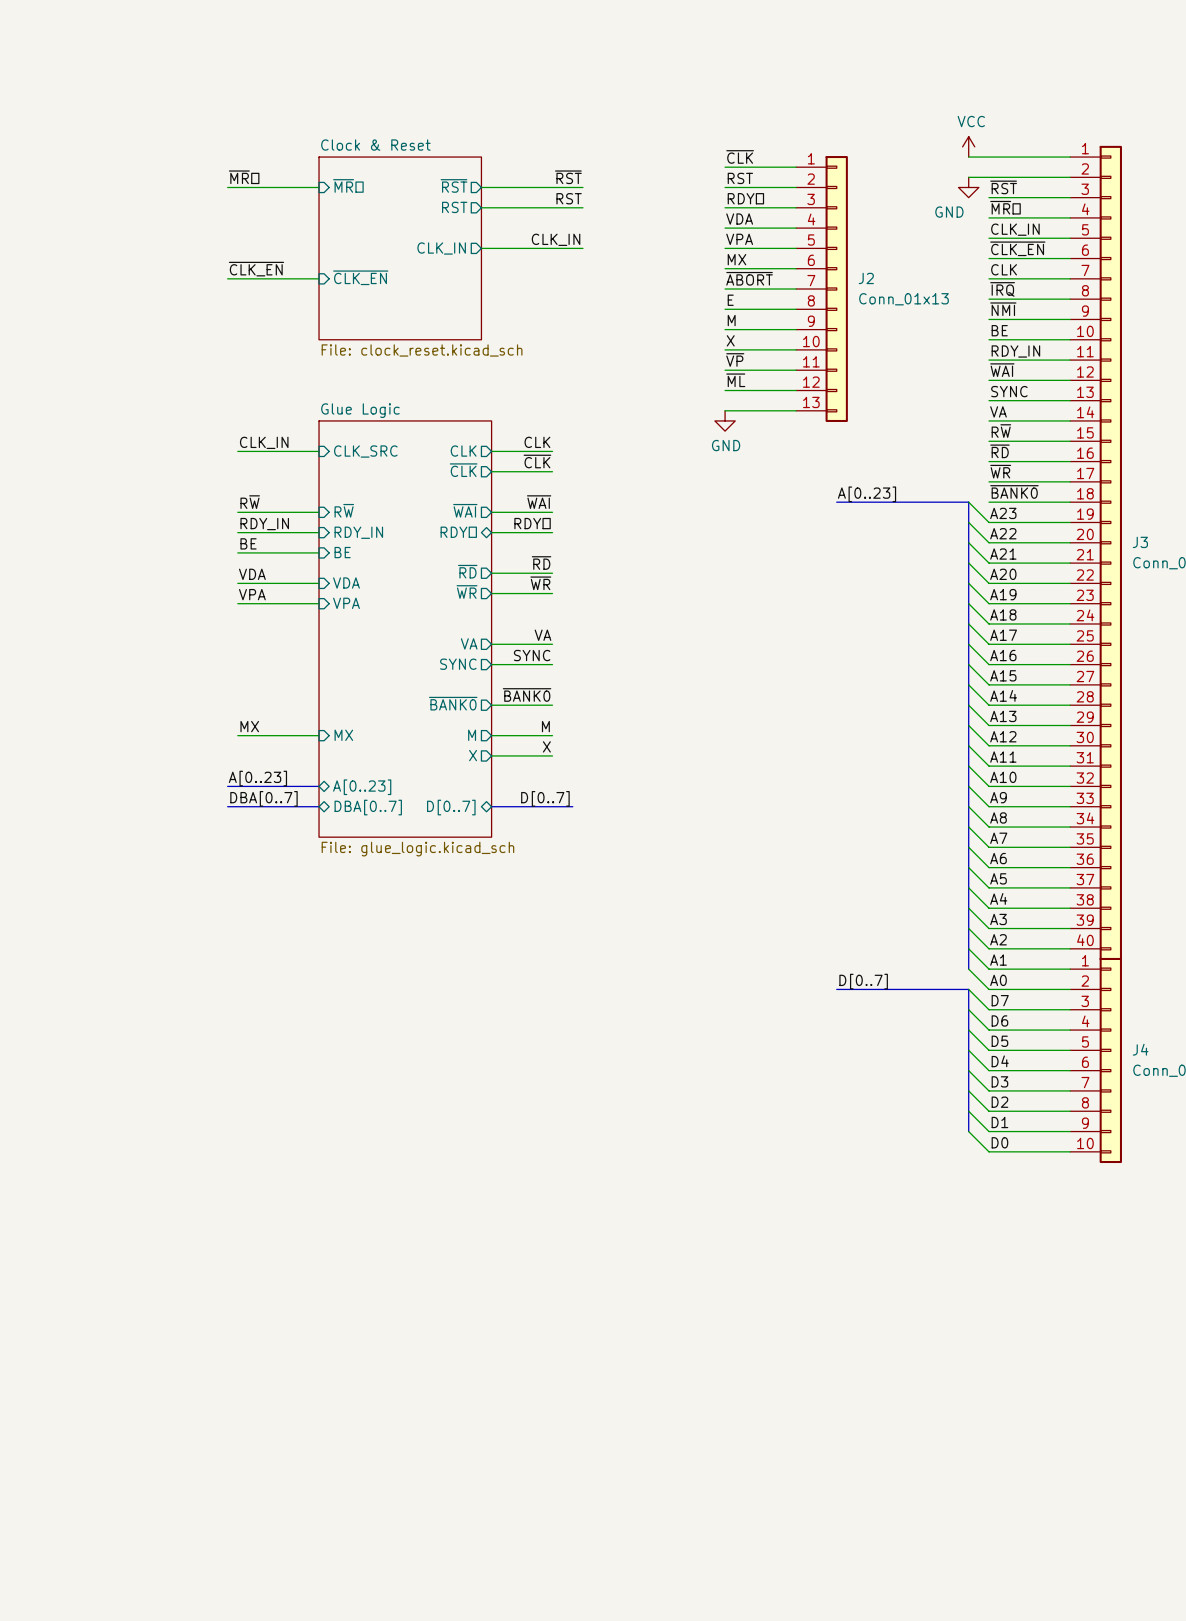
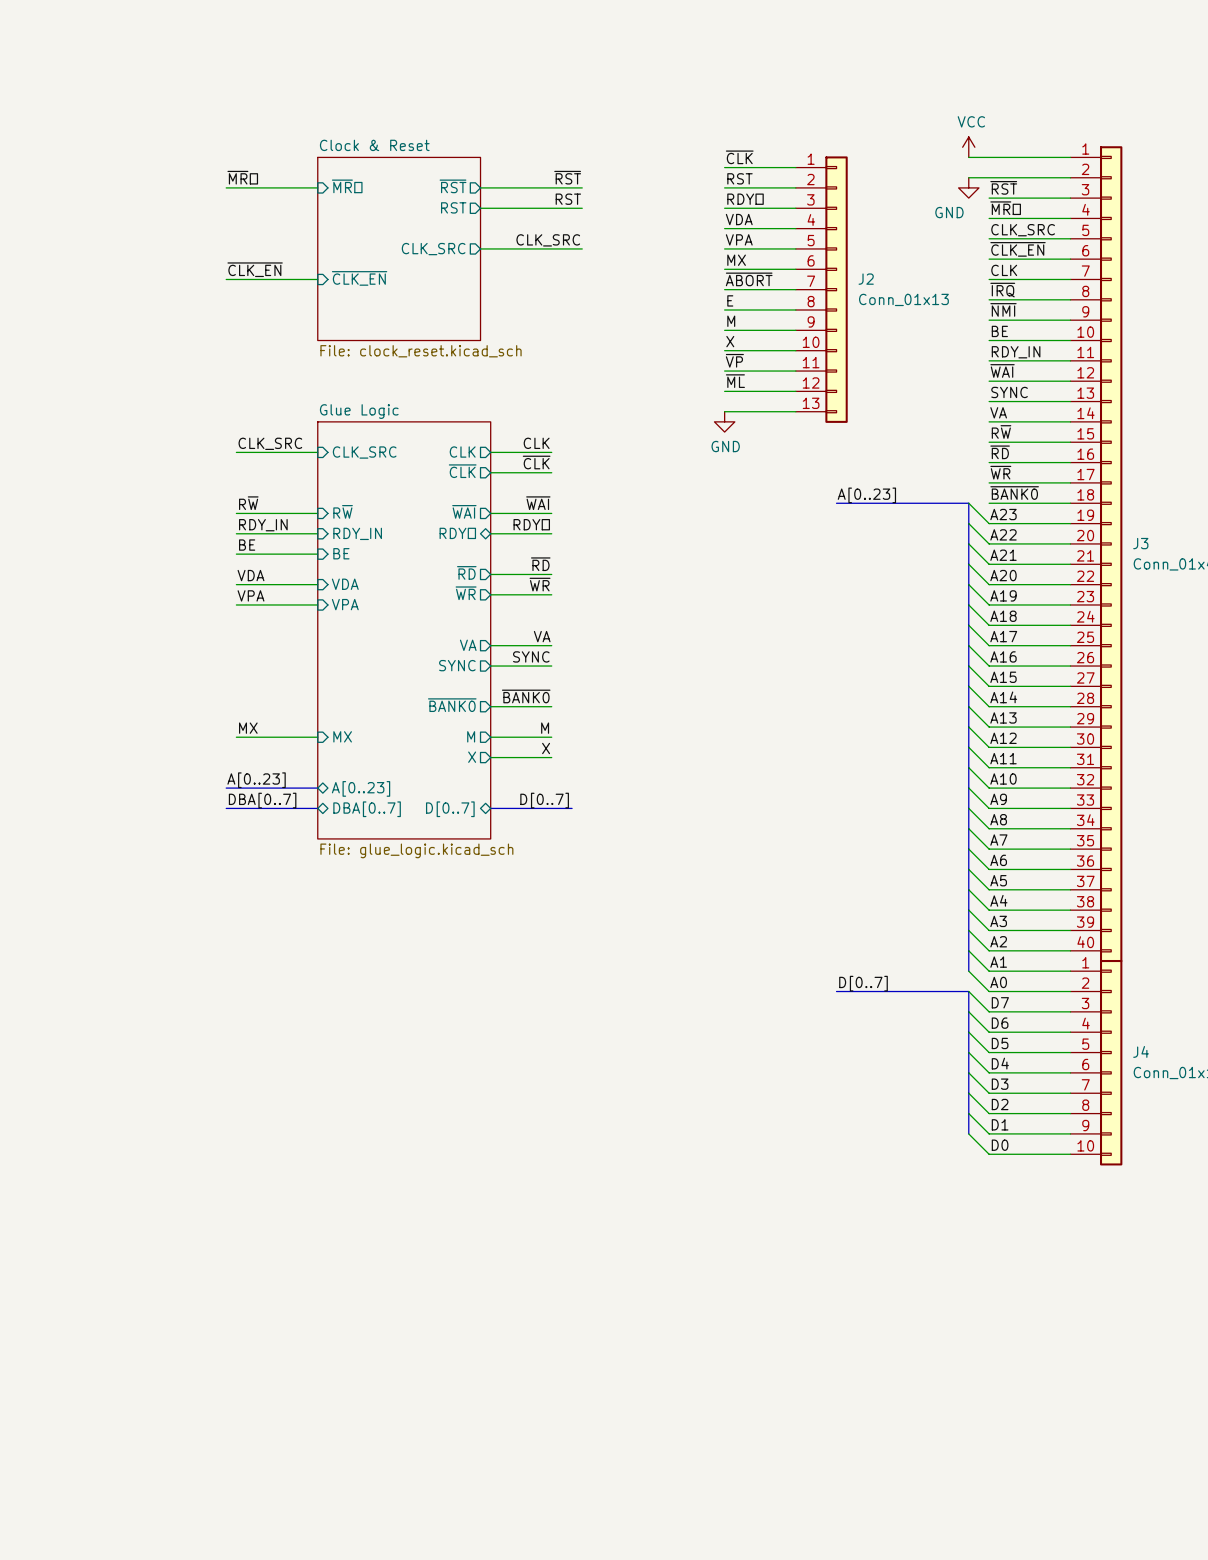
label: CLK_IN (1015, 229) -> CLK_SRC (1023, 230)
label: CLK_IN (556, 239) -> CLK_SRC (548, 240)
sheet pin: CLK_IN (441, 248) -> CLK_SRC (433, 249)
label: CLK_IN (264, 442) -> CLK_SRC (270, 443)

